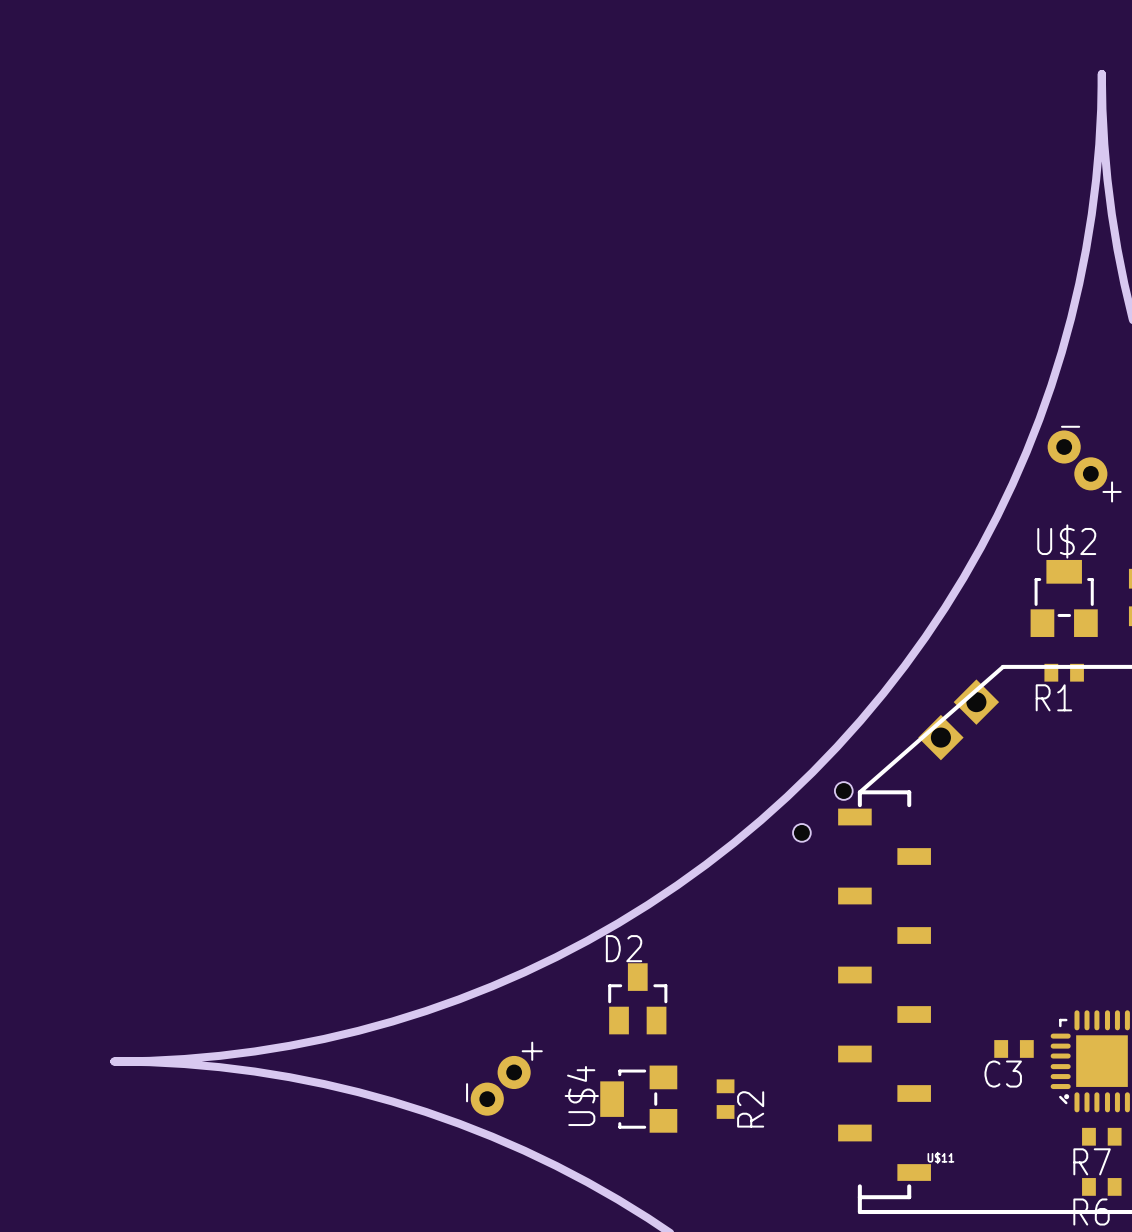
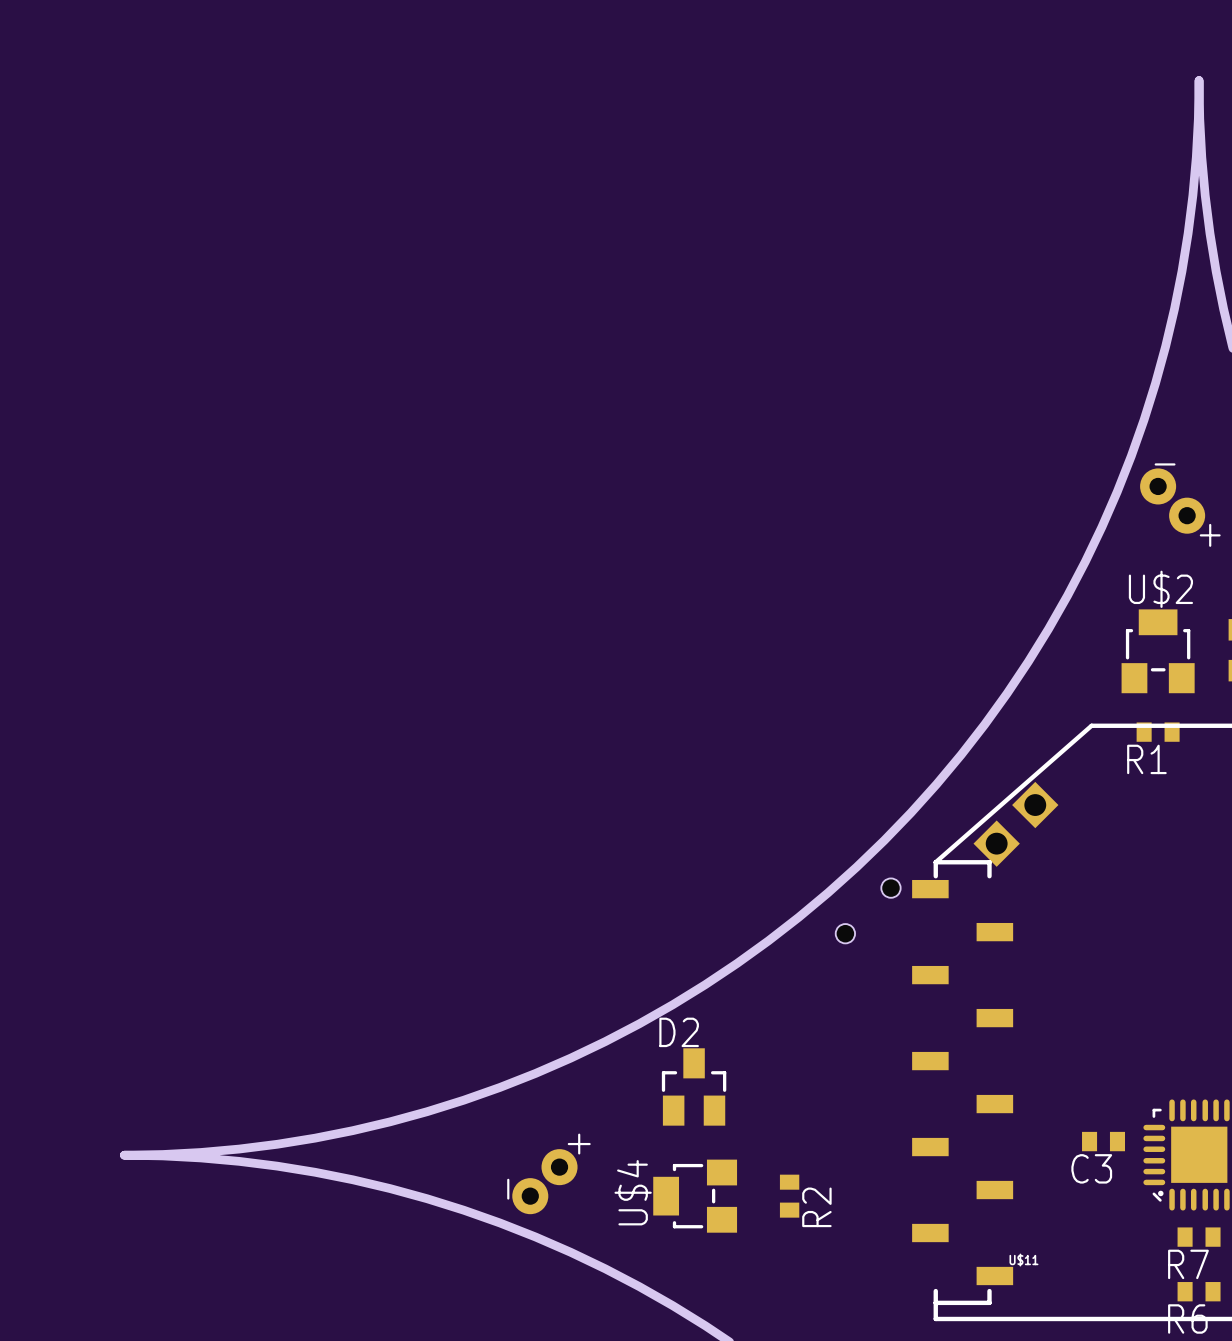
part: (958, 719) -> none
part: none -> (1015, 824)
part position: (822, 811) -> (868, 910)

